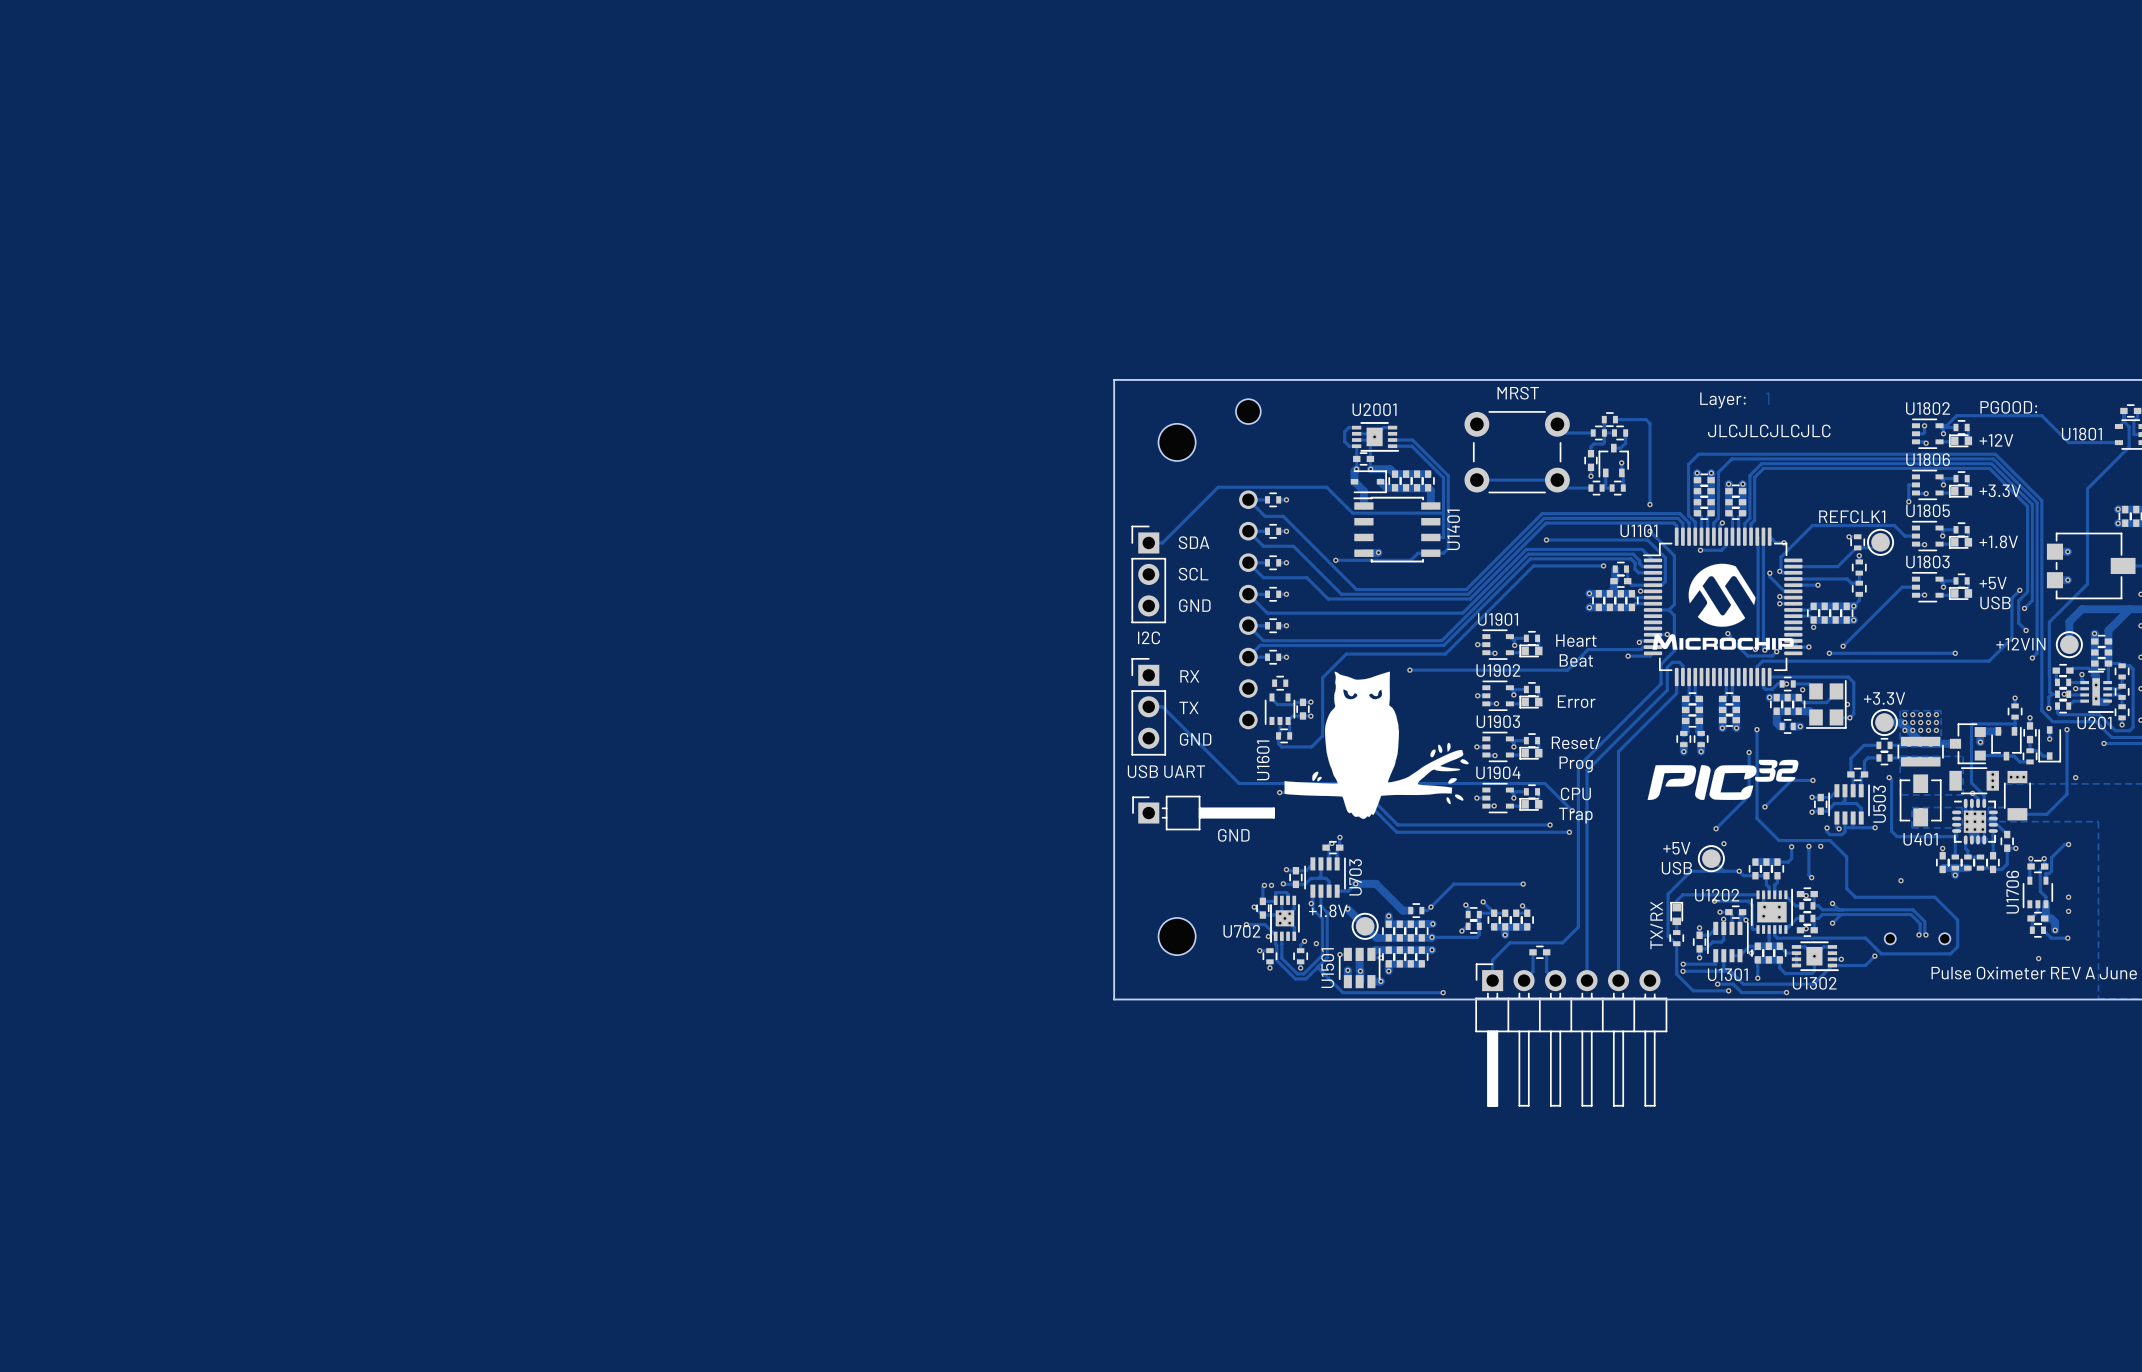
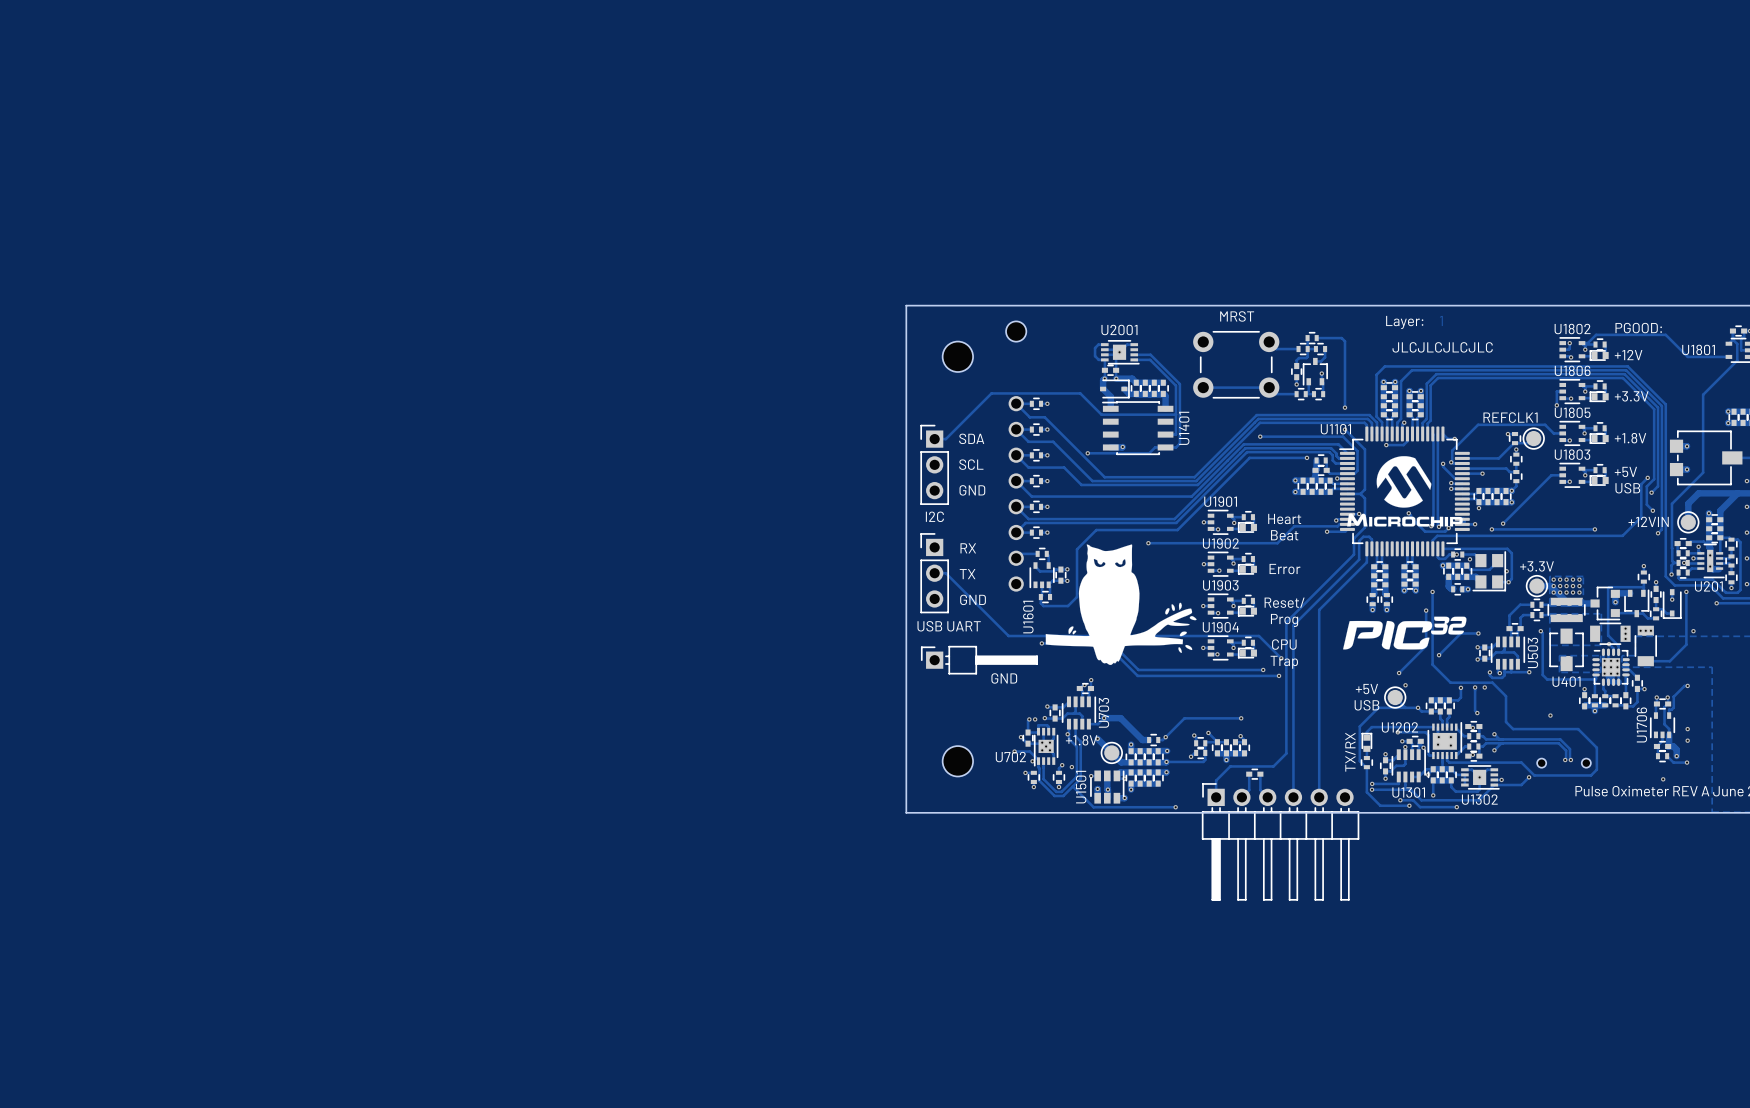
track: none -> (1020, 553) (1037, 553)
track: none -> (1046, 553) (1048, 555) (1048, 565)

